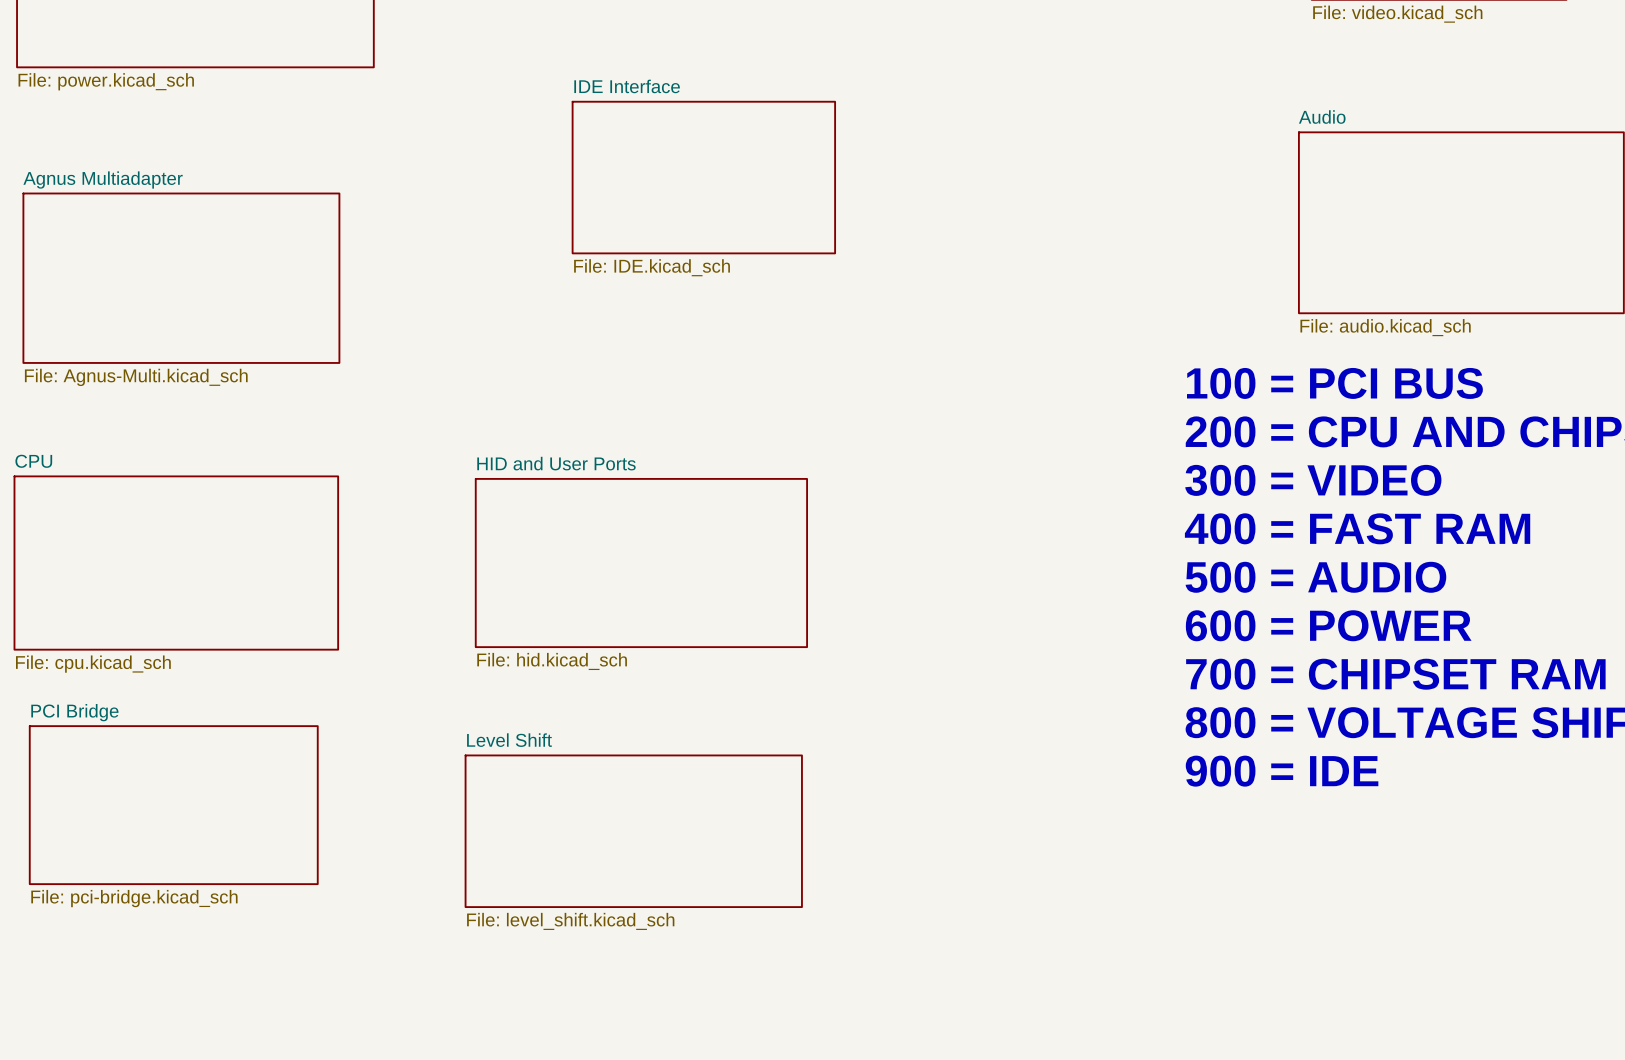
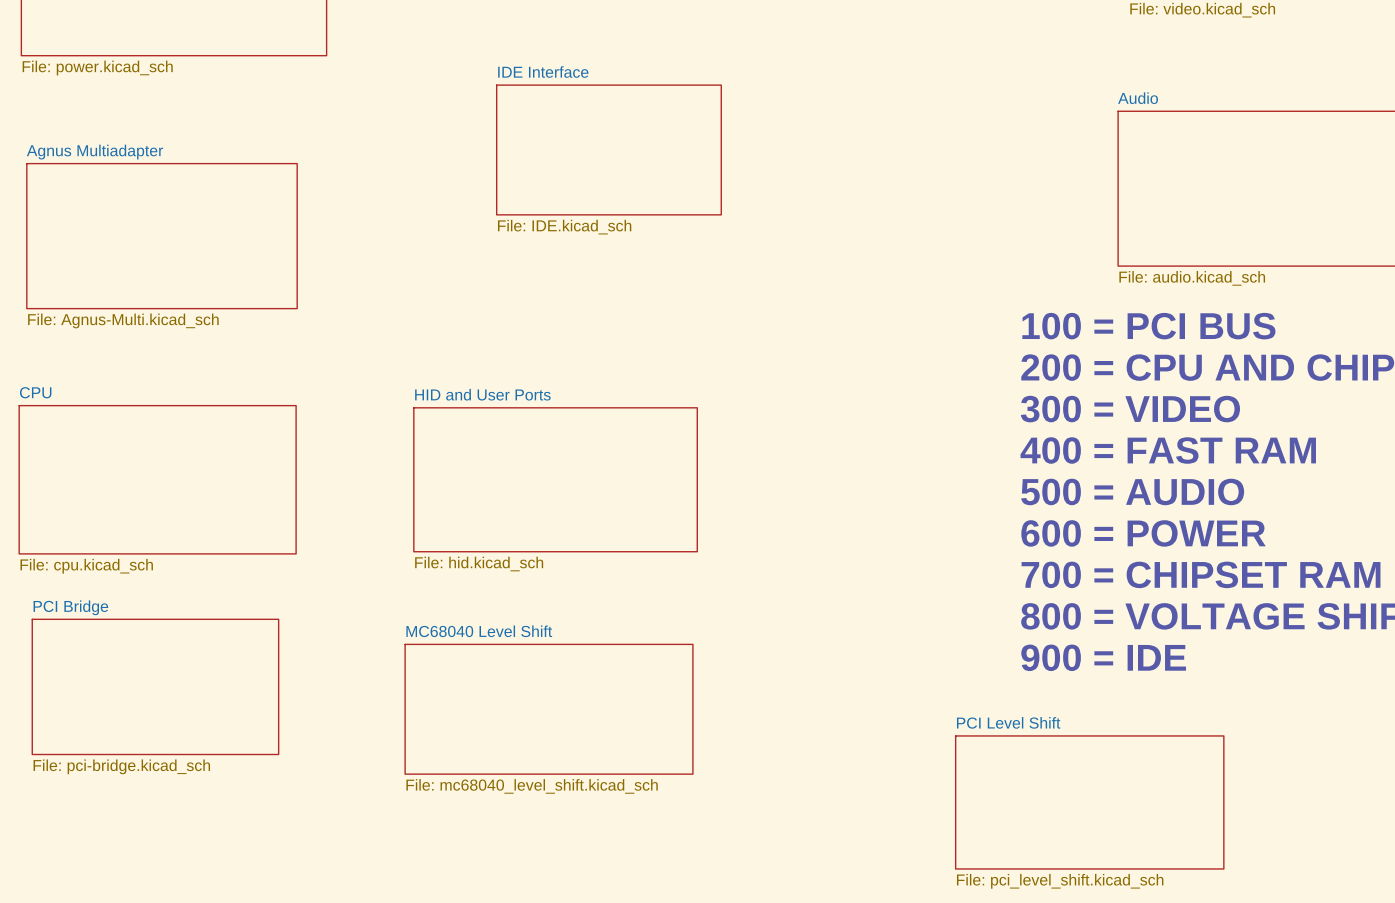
sheet Level Shift name: Level Shift (509, 740) -> MC68040 Level Shift (479, 631)
sheet Level Shift value: File: level_shift.kicad_sch (570, 921) -> File: mc68040_level_shift.kicad_sch (532, 786)
sheet PCI Level Shift: none -> File: pci_level_shift.kicad_sch (1089, 802)

